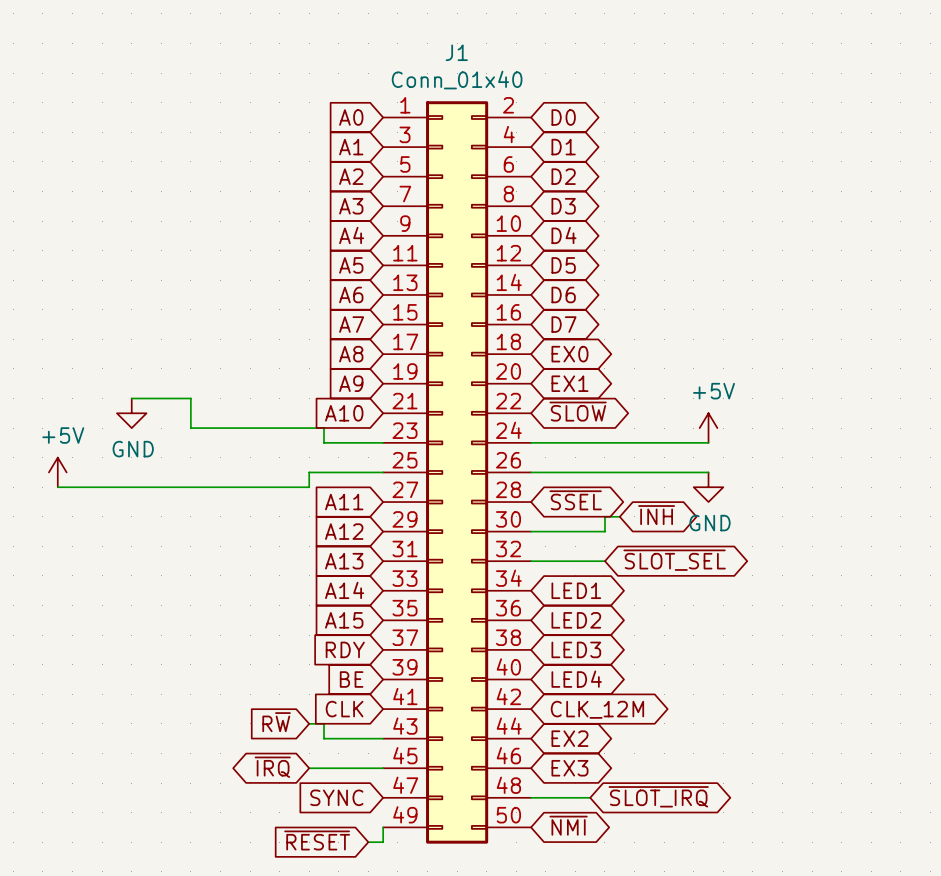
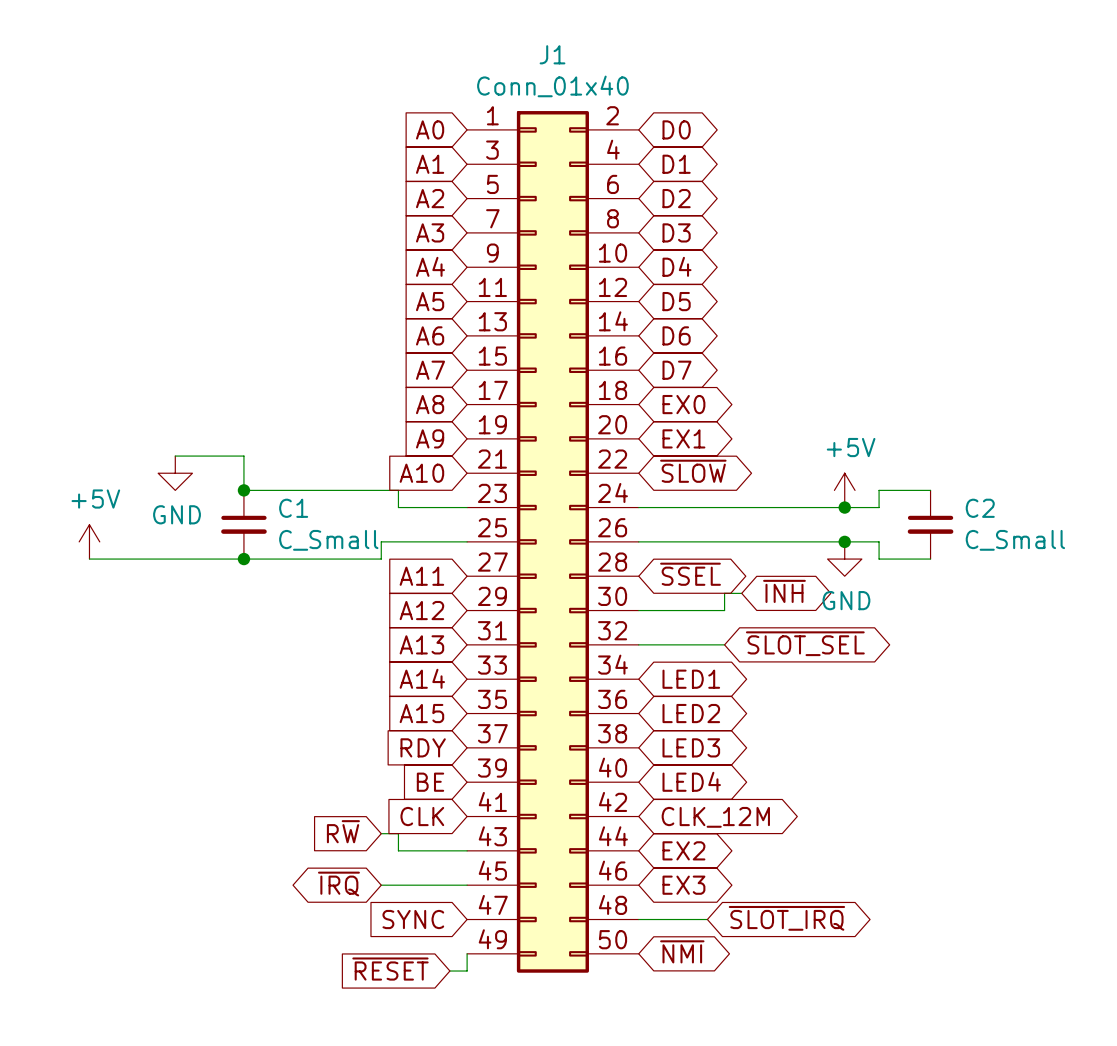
junction: none -> (243, 490)
wire: none -> (930, 490) (879, 490) (879, 507) (844, 507)
junction: none -> (844, 507)
C1: none -> C_Small (243, 524)
C2: none -> C_Small (930, 524)
wire: none -> (844, 541) (879, 541) (879, 559) (930, 559)
junction: none -> (844, 541)
junction: none -> (243, 559)

